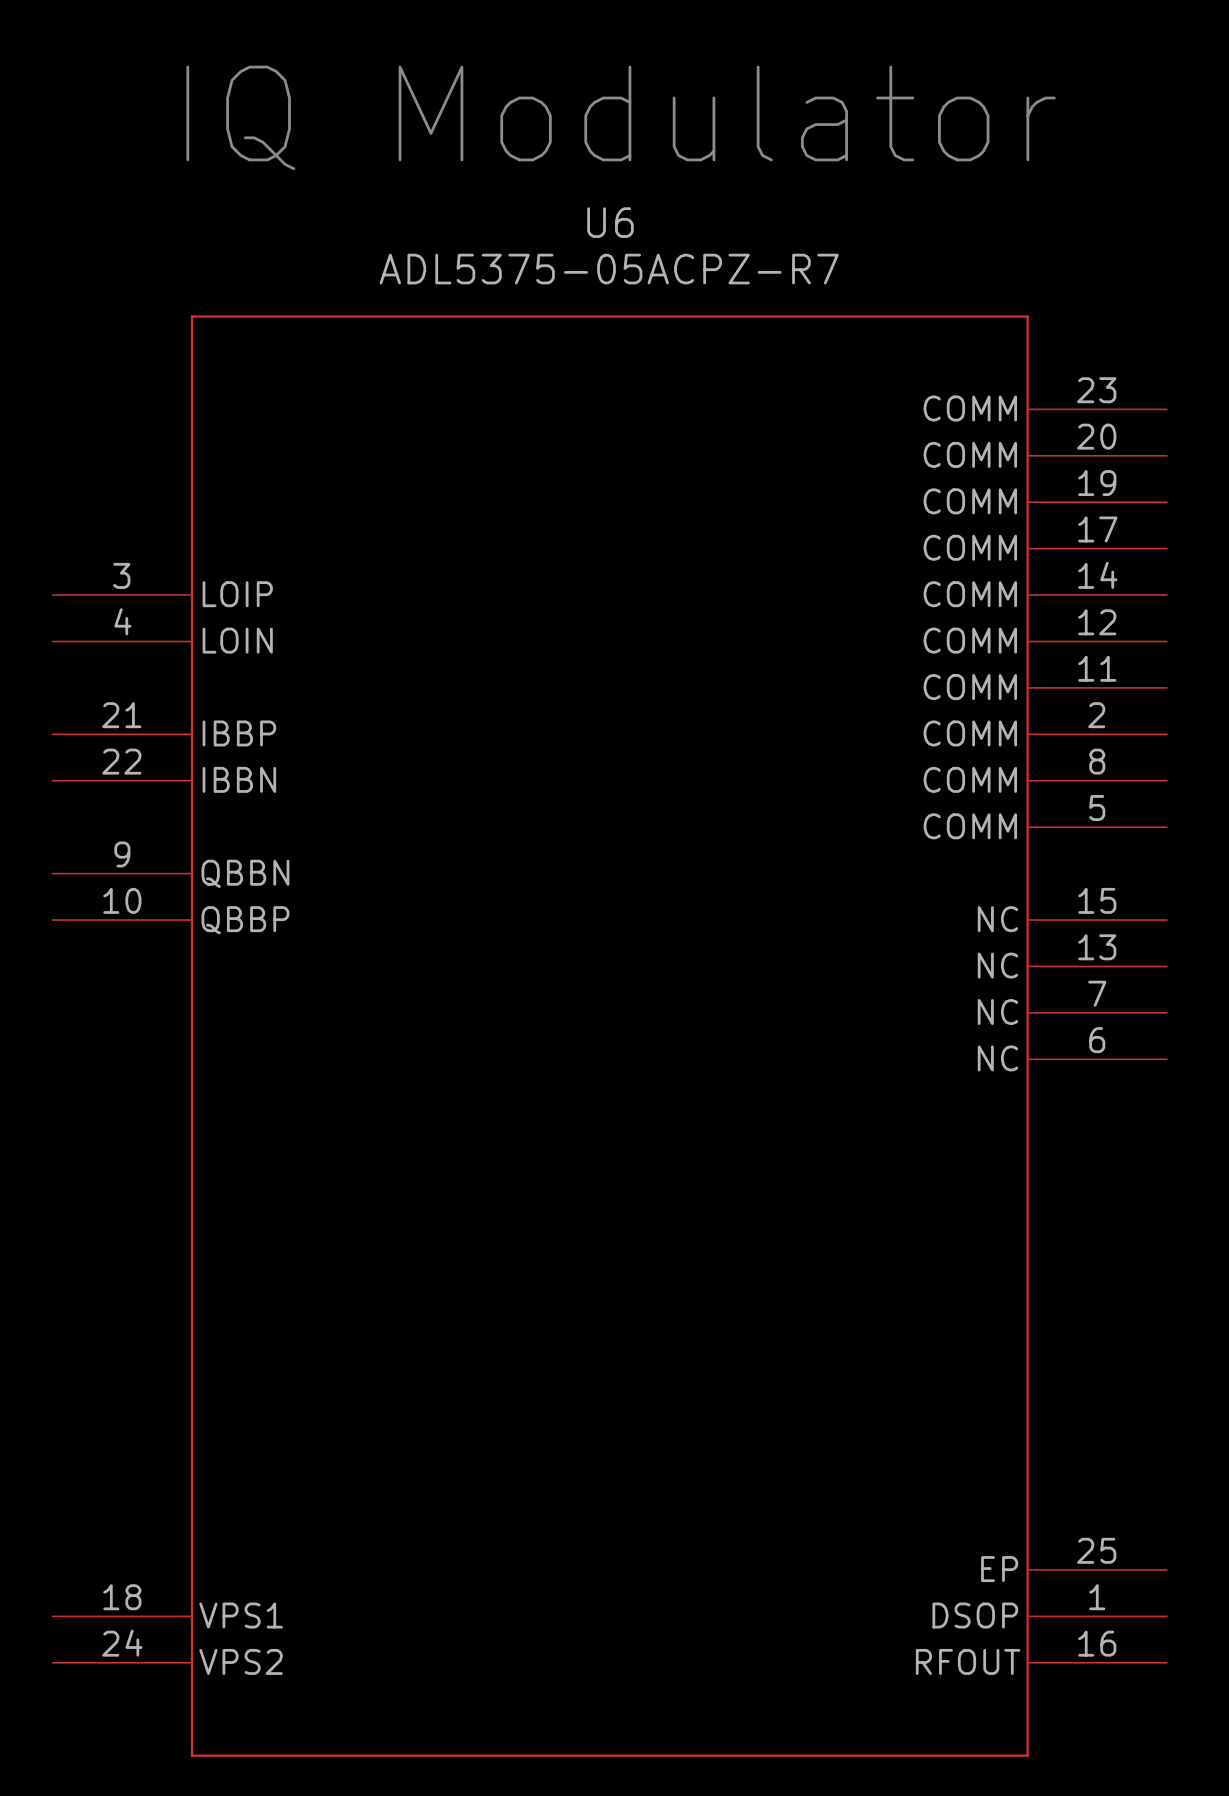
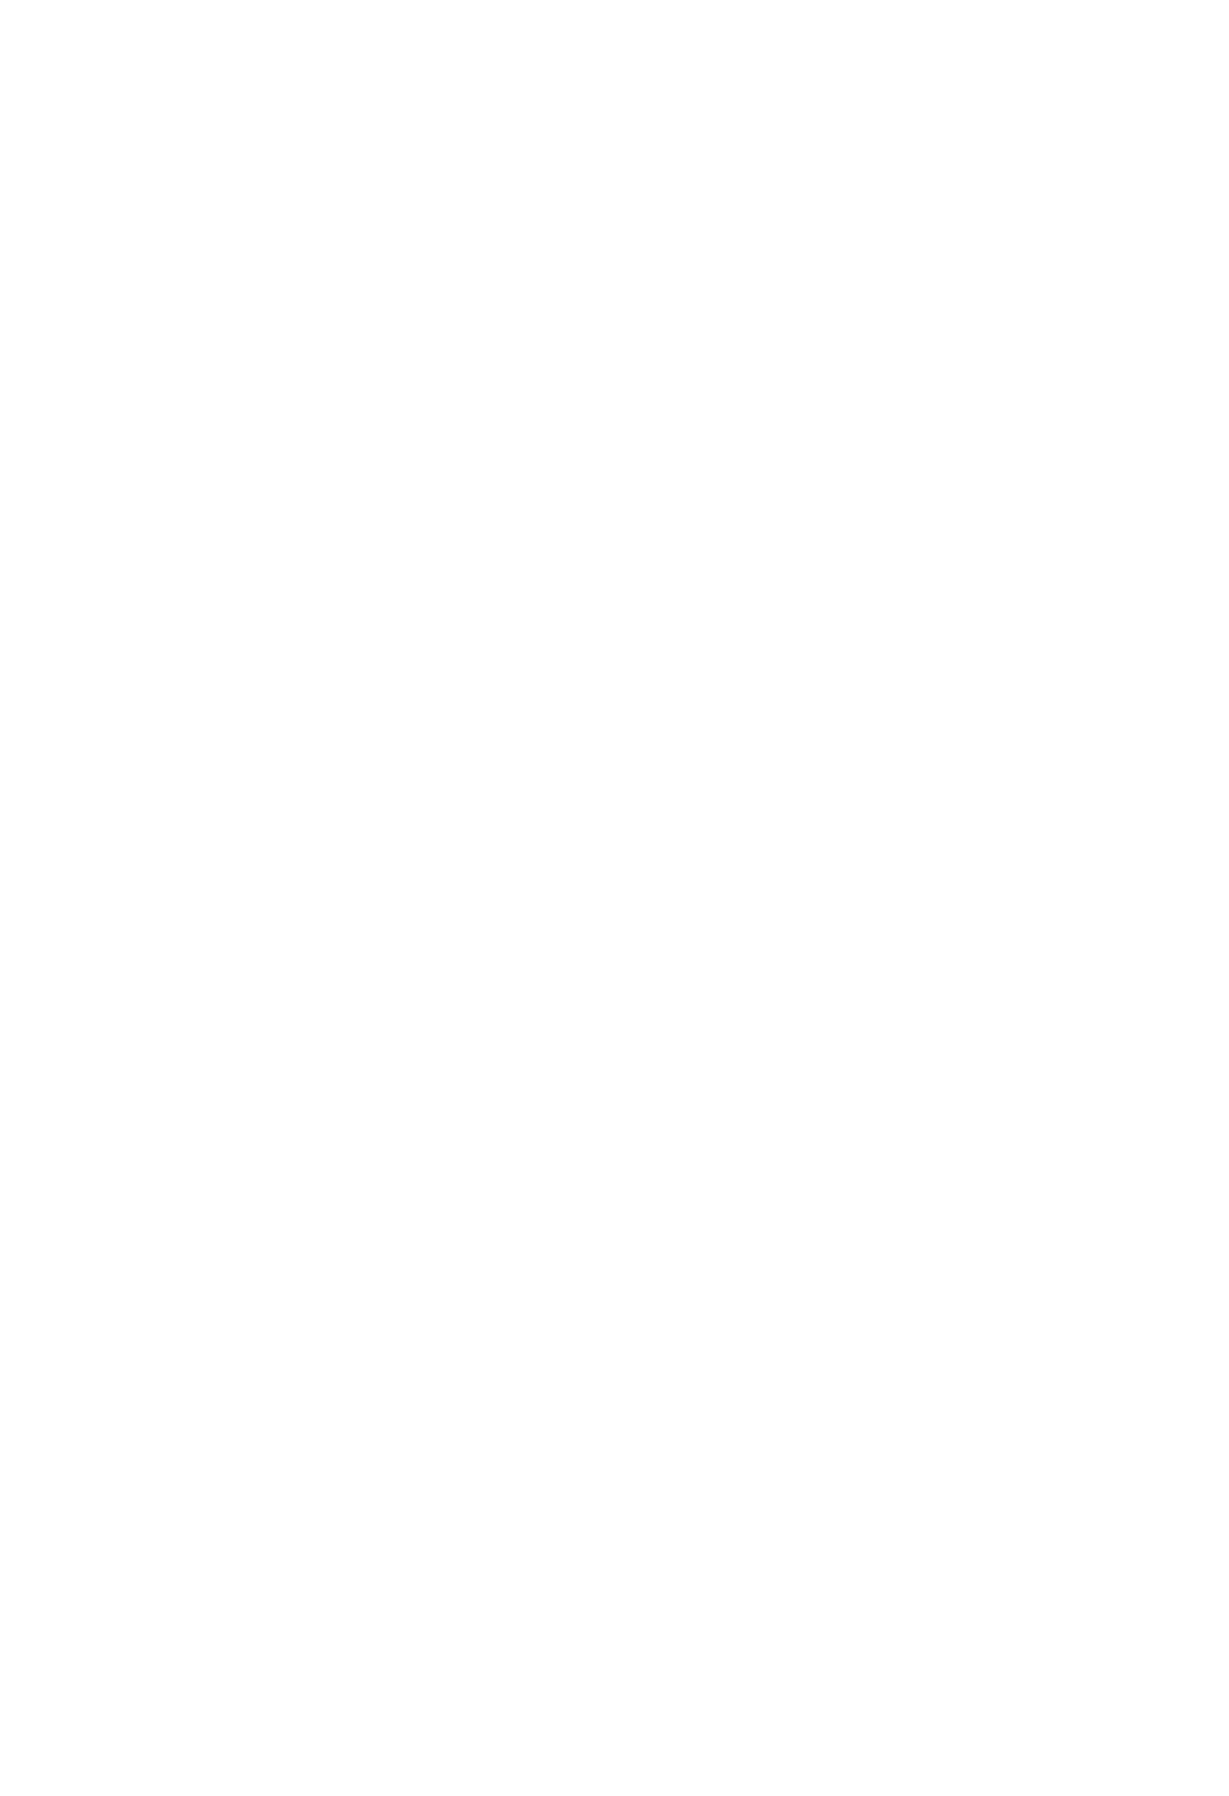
text: IQ Modulator (621, 117) -> none
U6: ADL5375-05ACPZ-R7 (609, 1036) -> none

